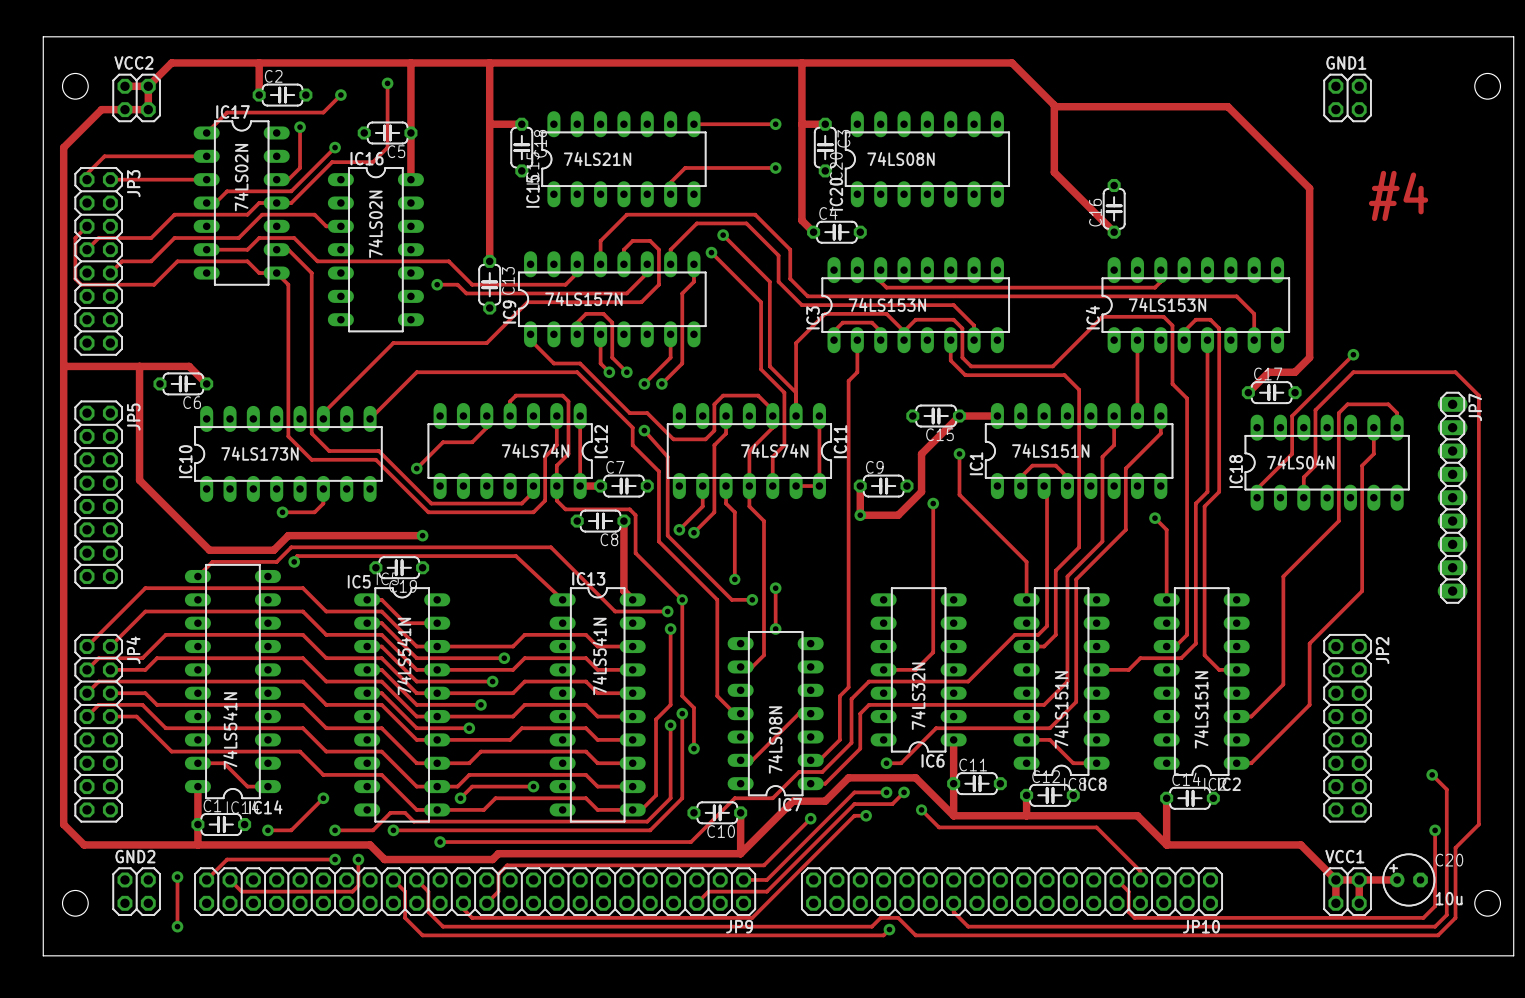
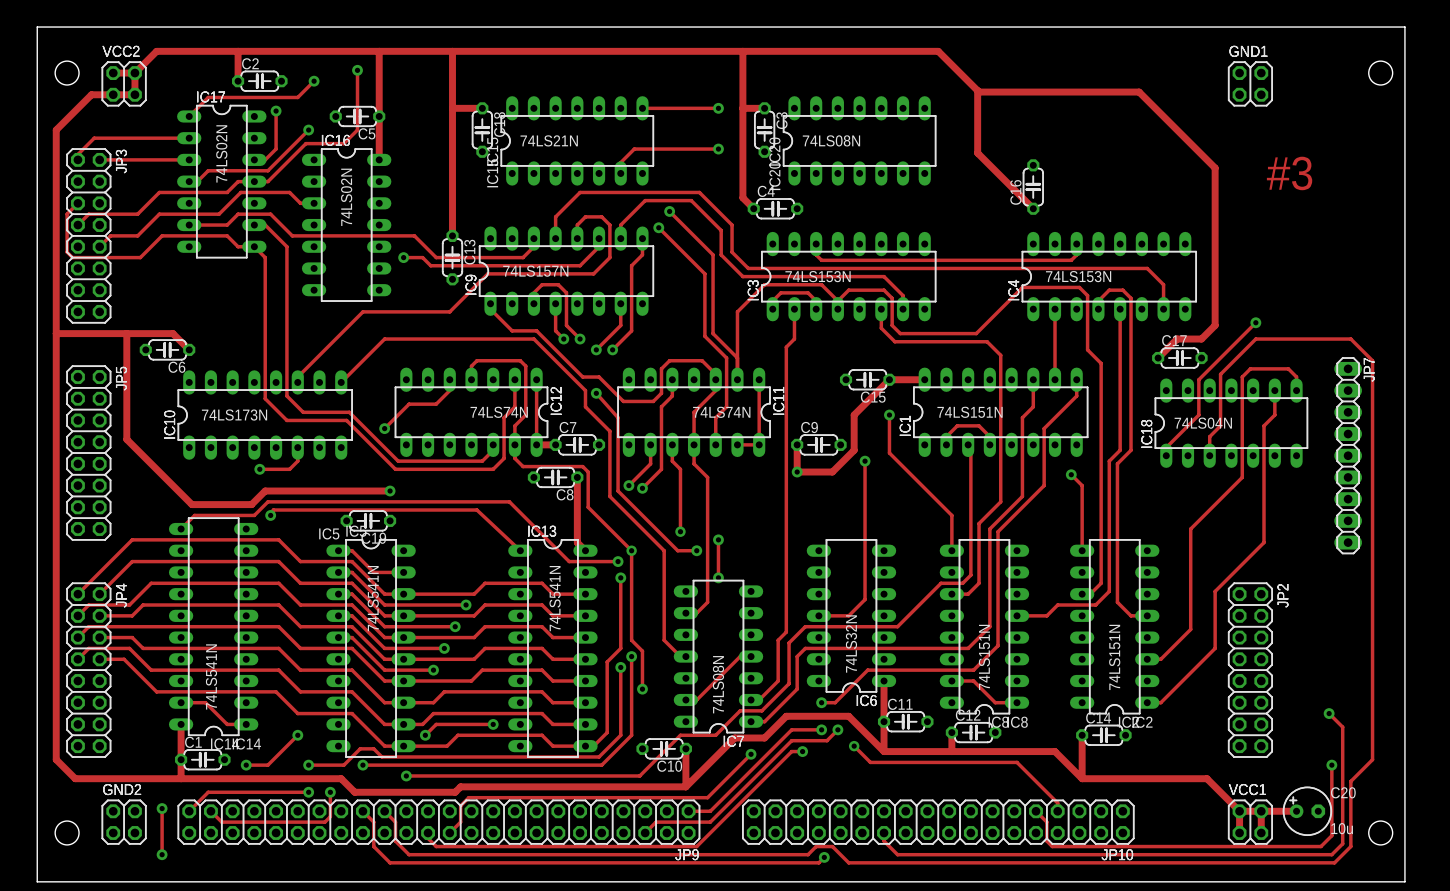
text: #4 (1398, 195) -> #3 (1289, 173)

